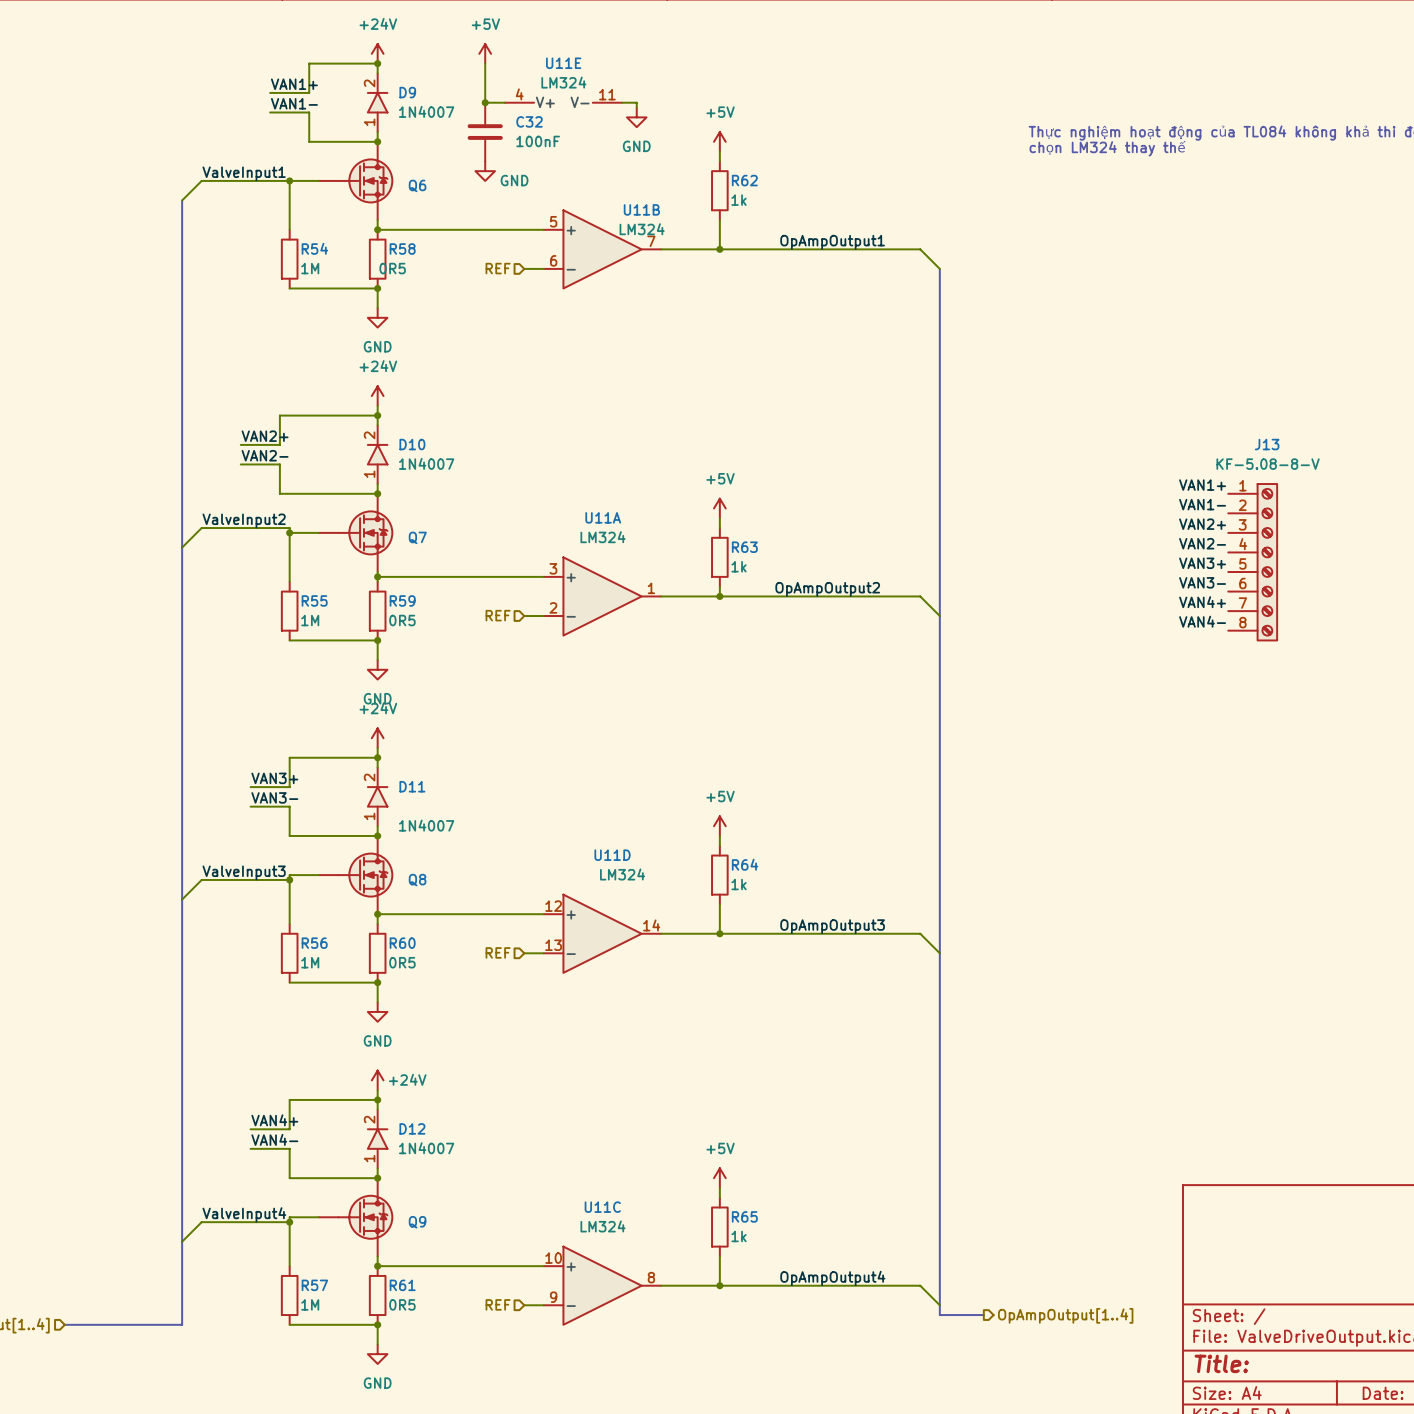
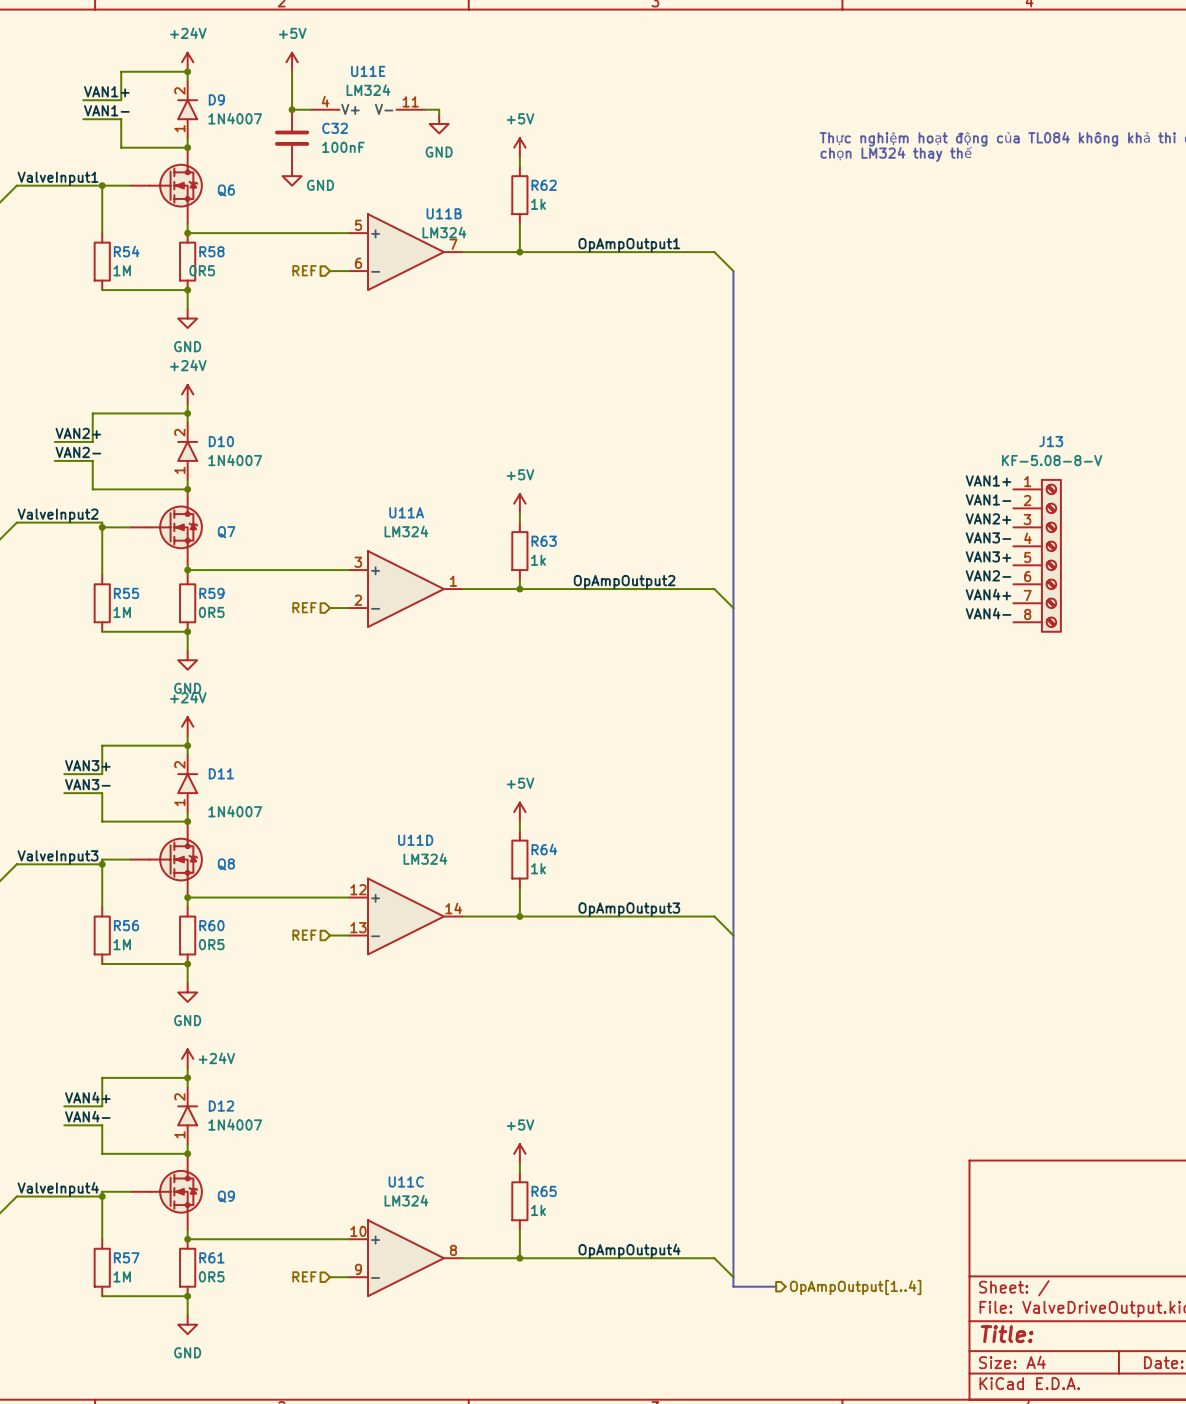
label: VAN2- (1202, 543) -> VAN3- (988, 537)
label: VAN3- (1202, 582) -> VAN2- (988, 575)

